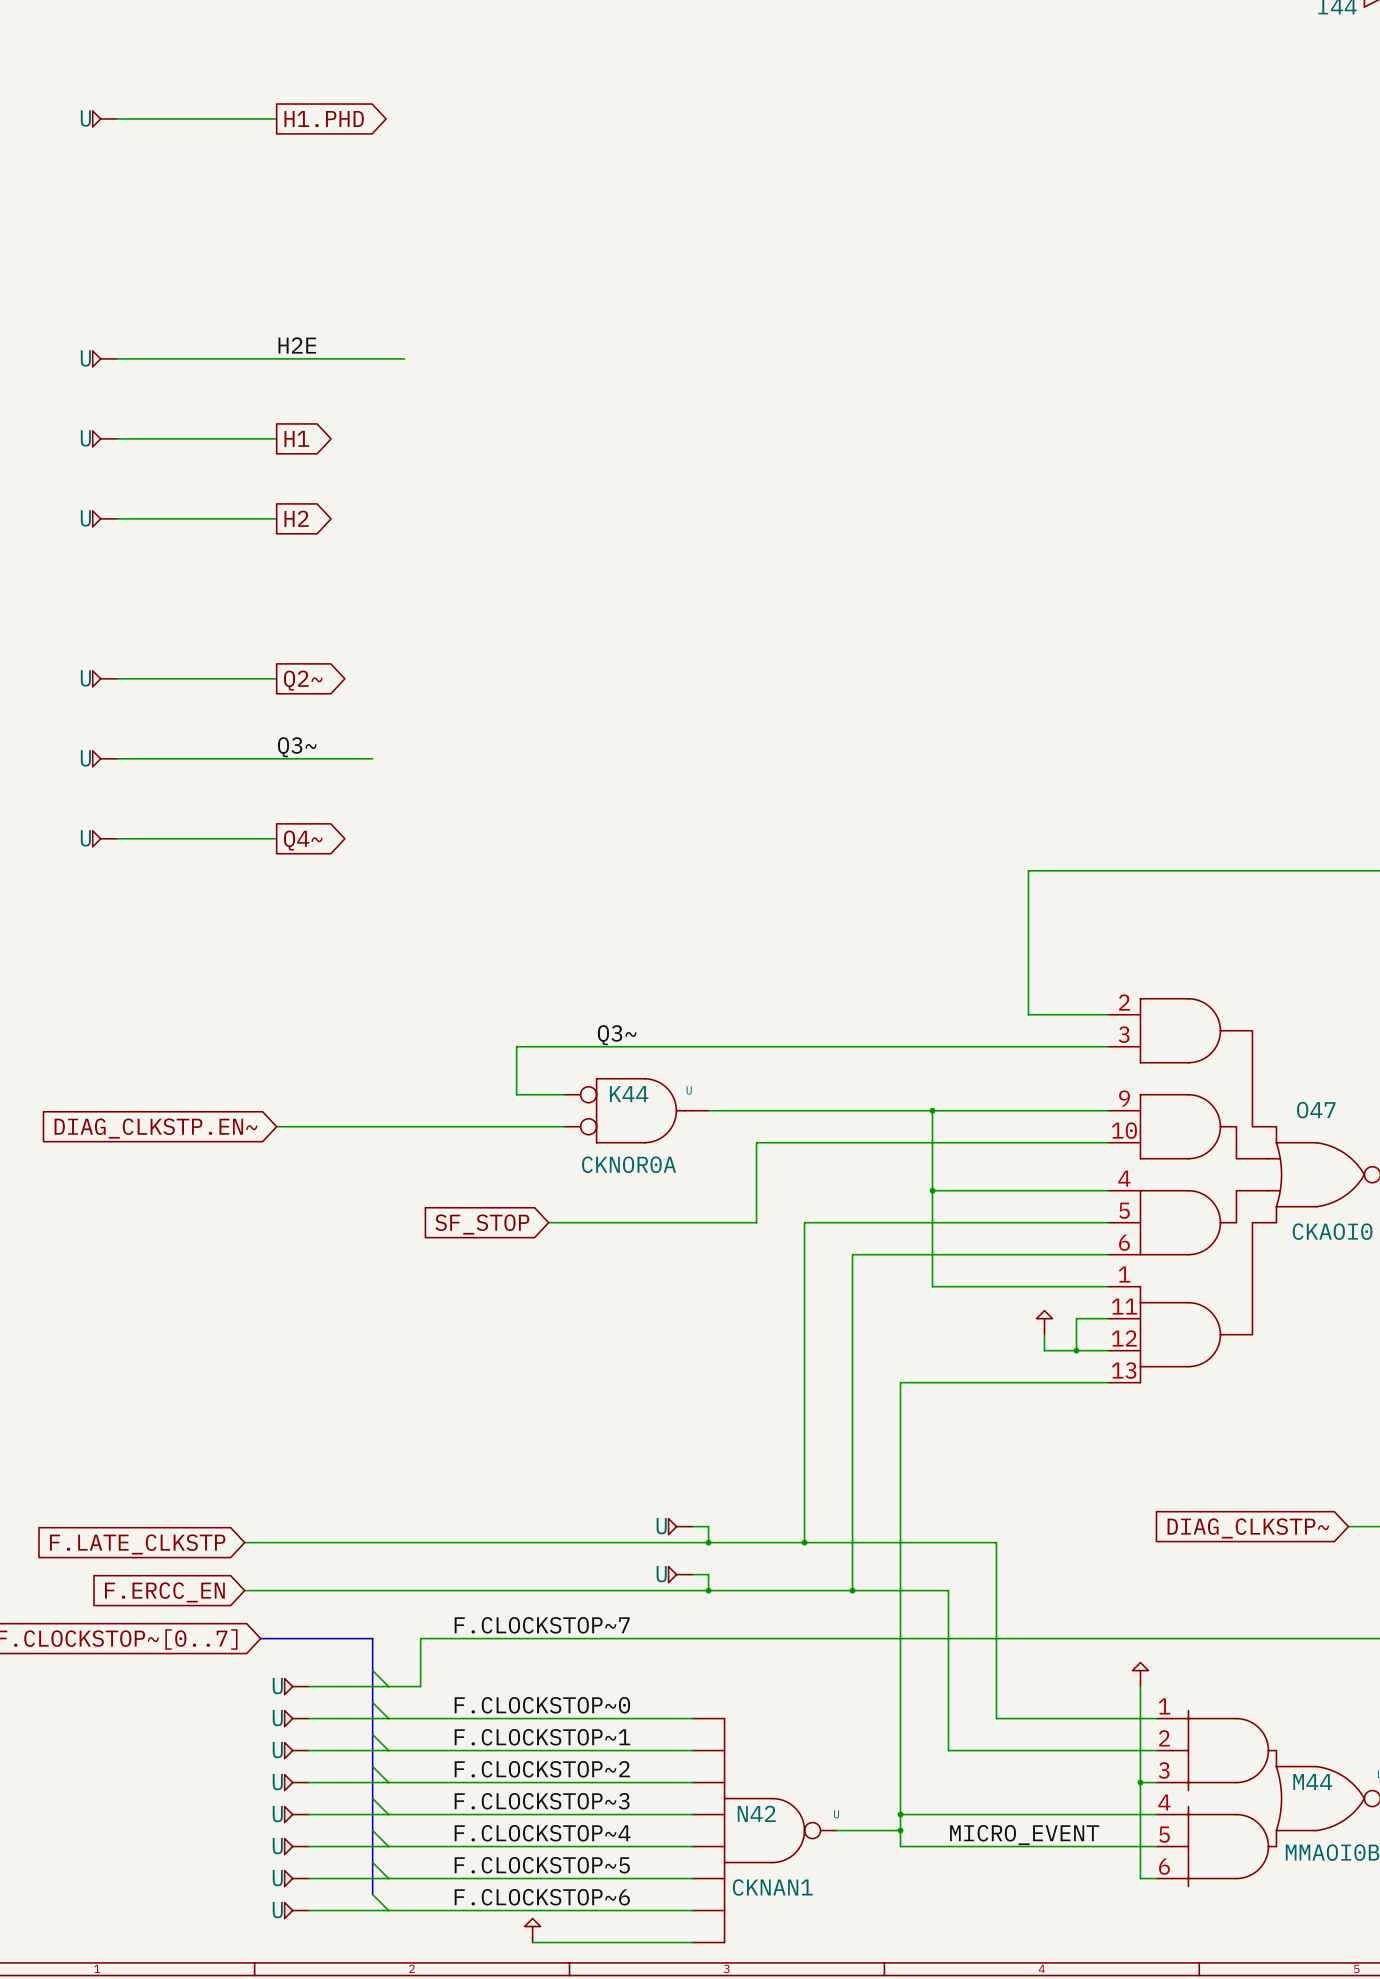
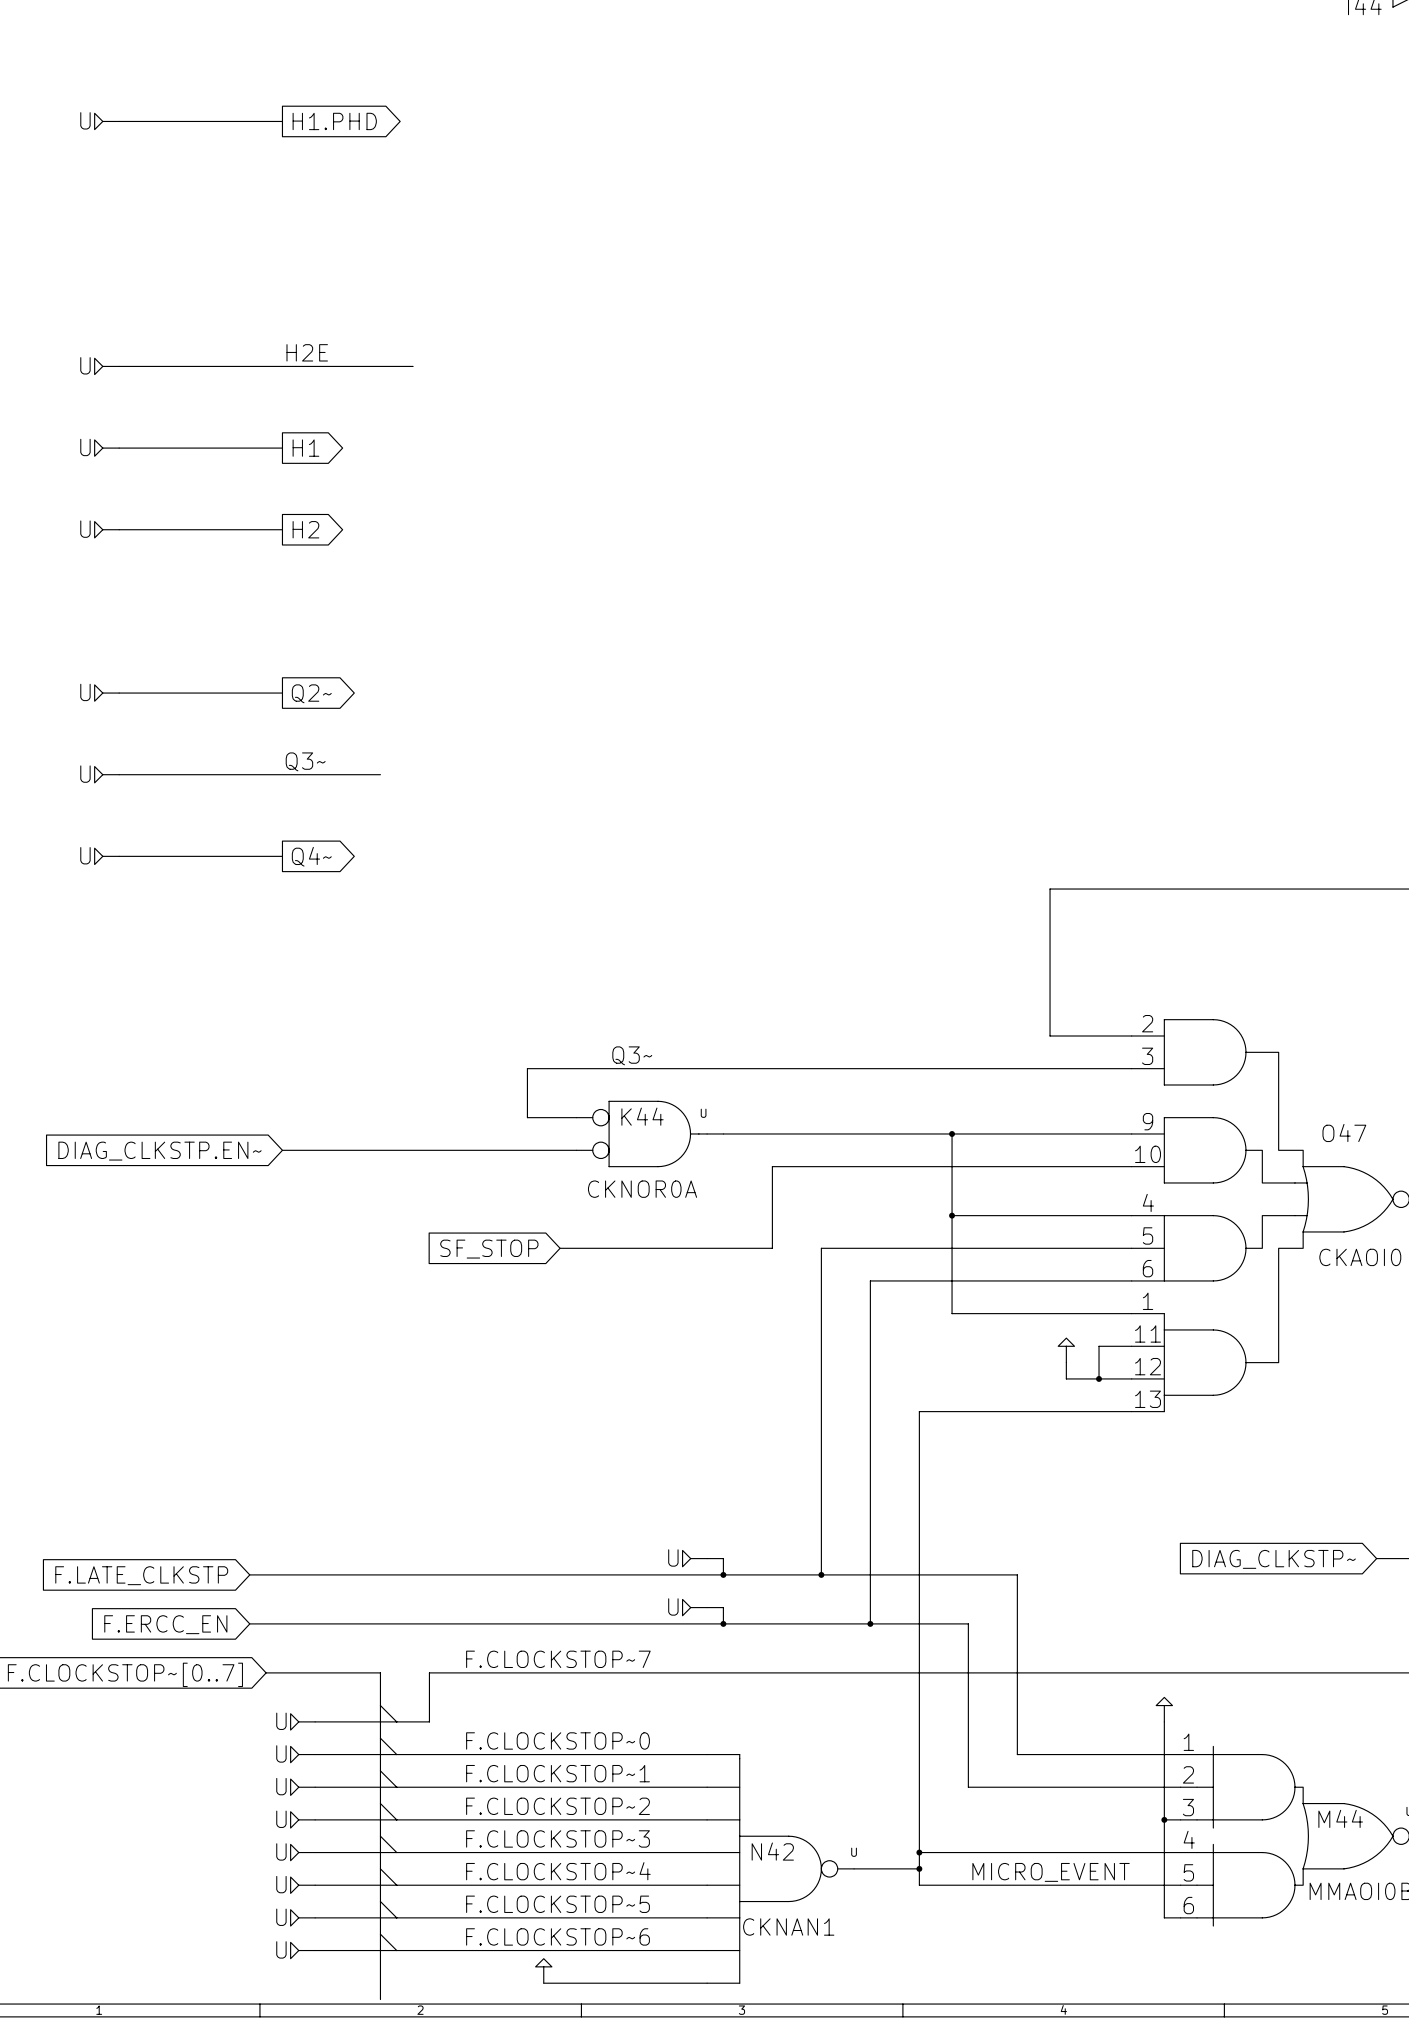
bus: none -> (380, 1934) (380, 1999)

